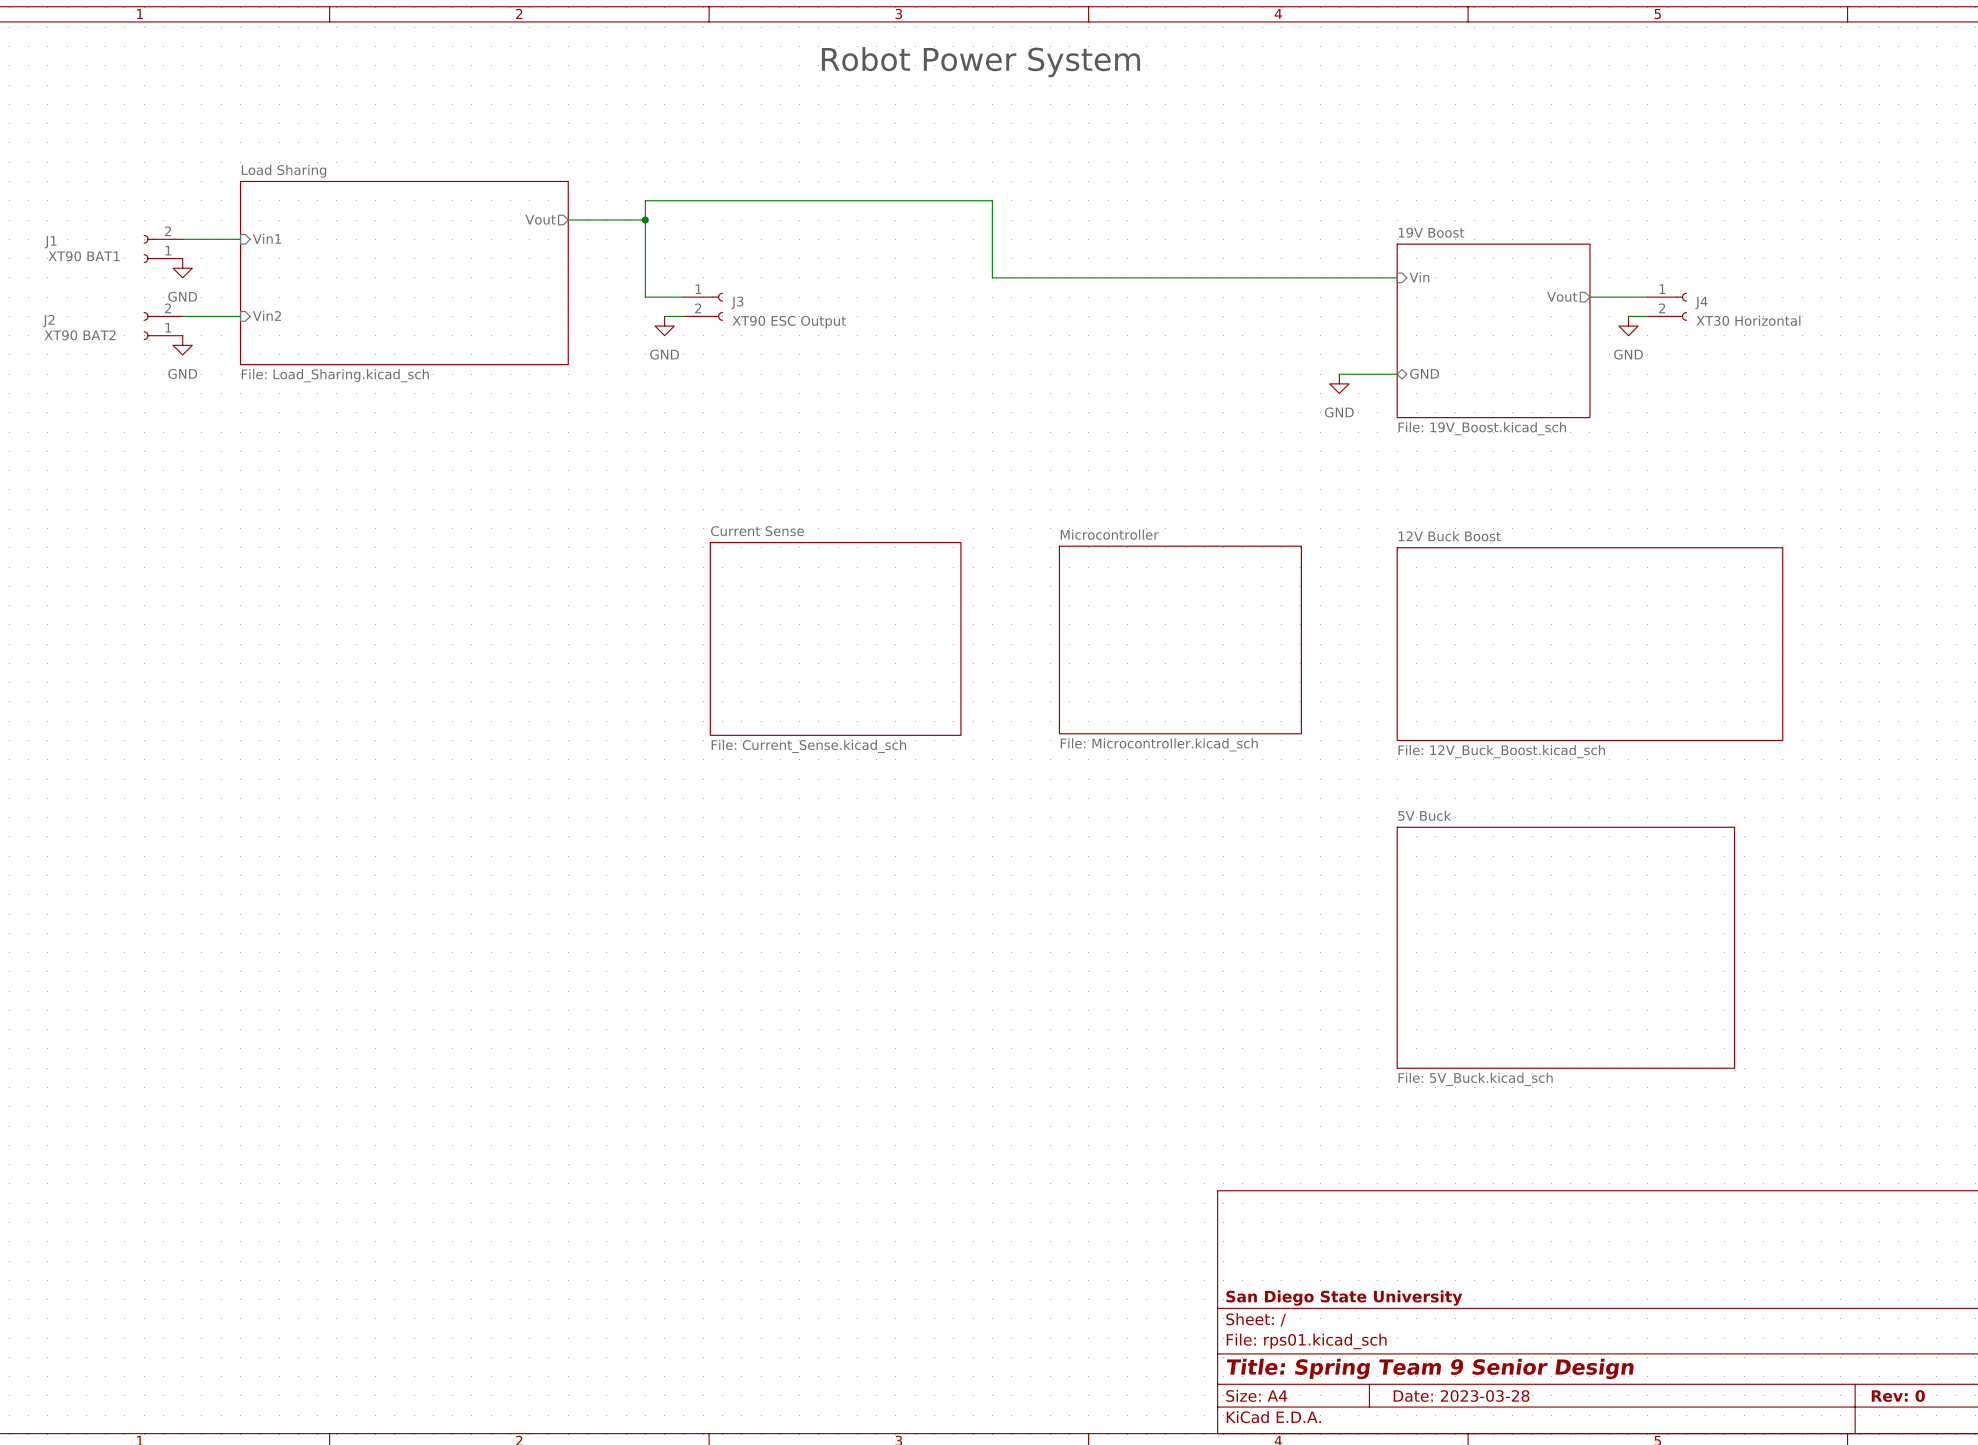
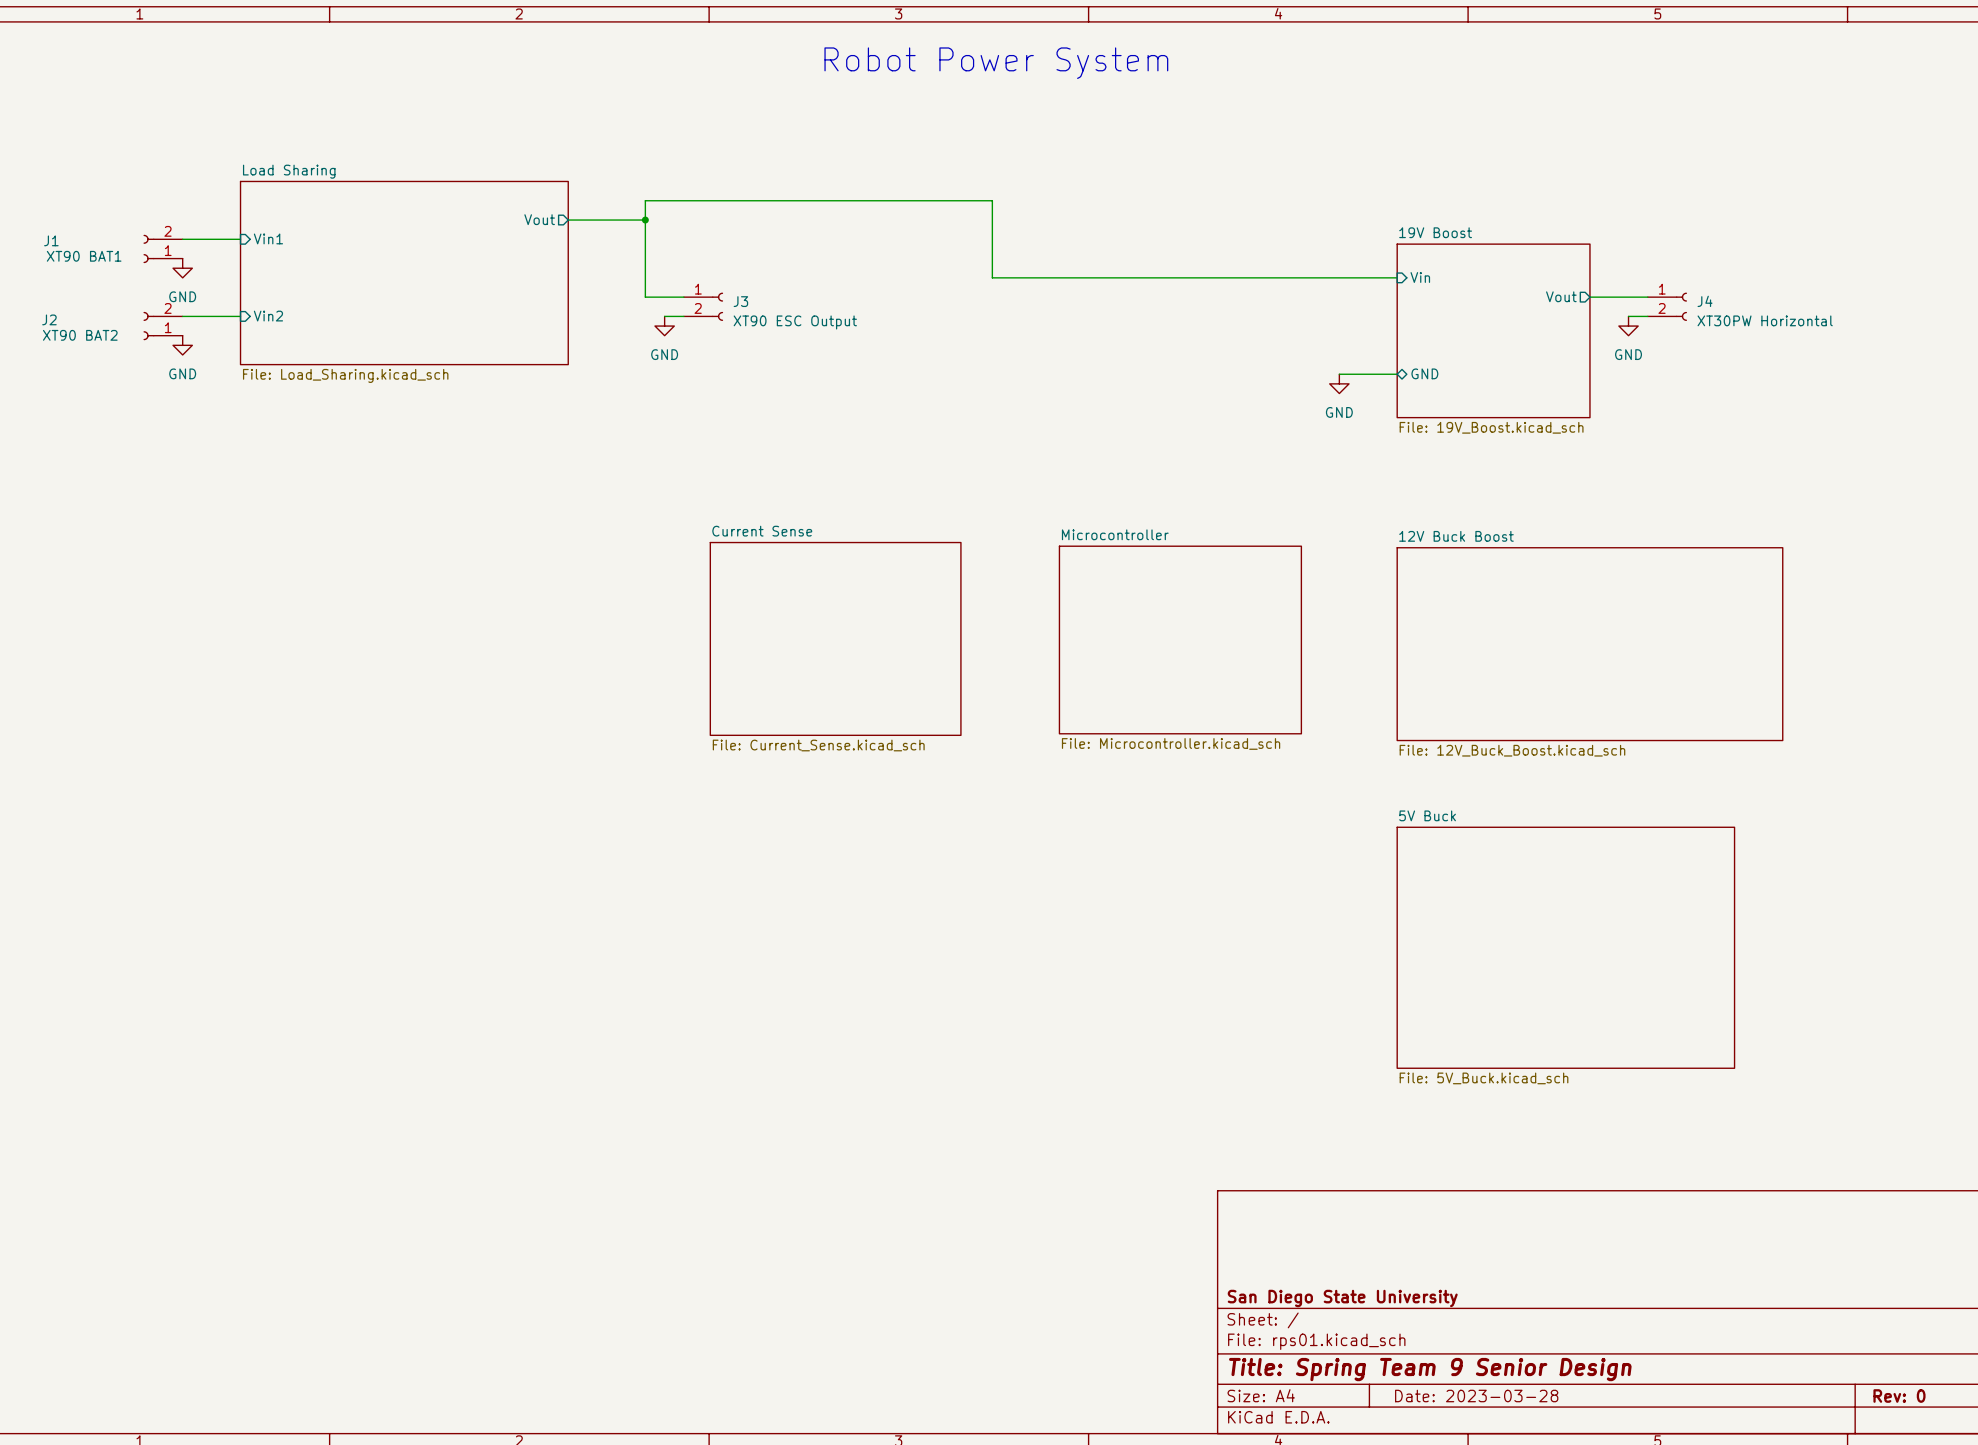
J4 value: XT30 Horizontal (1748, 320) -> XT30PW Horizontal (1765, 320)

